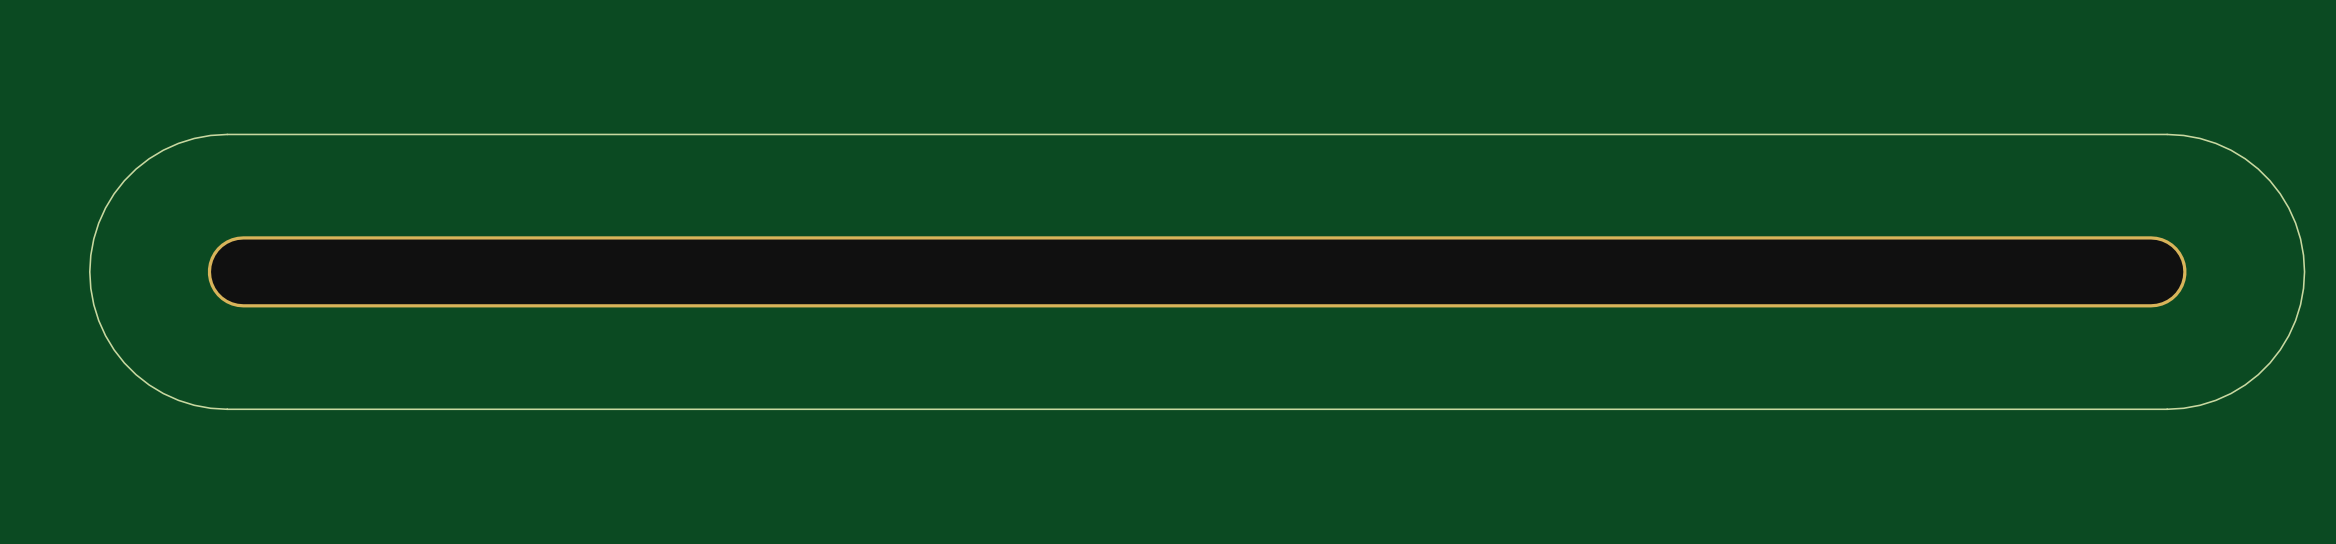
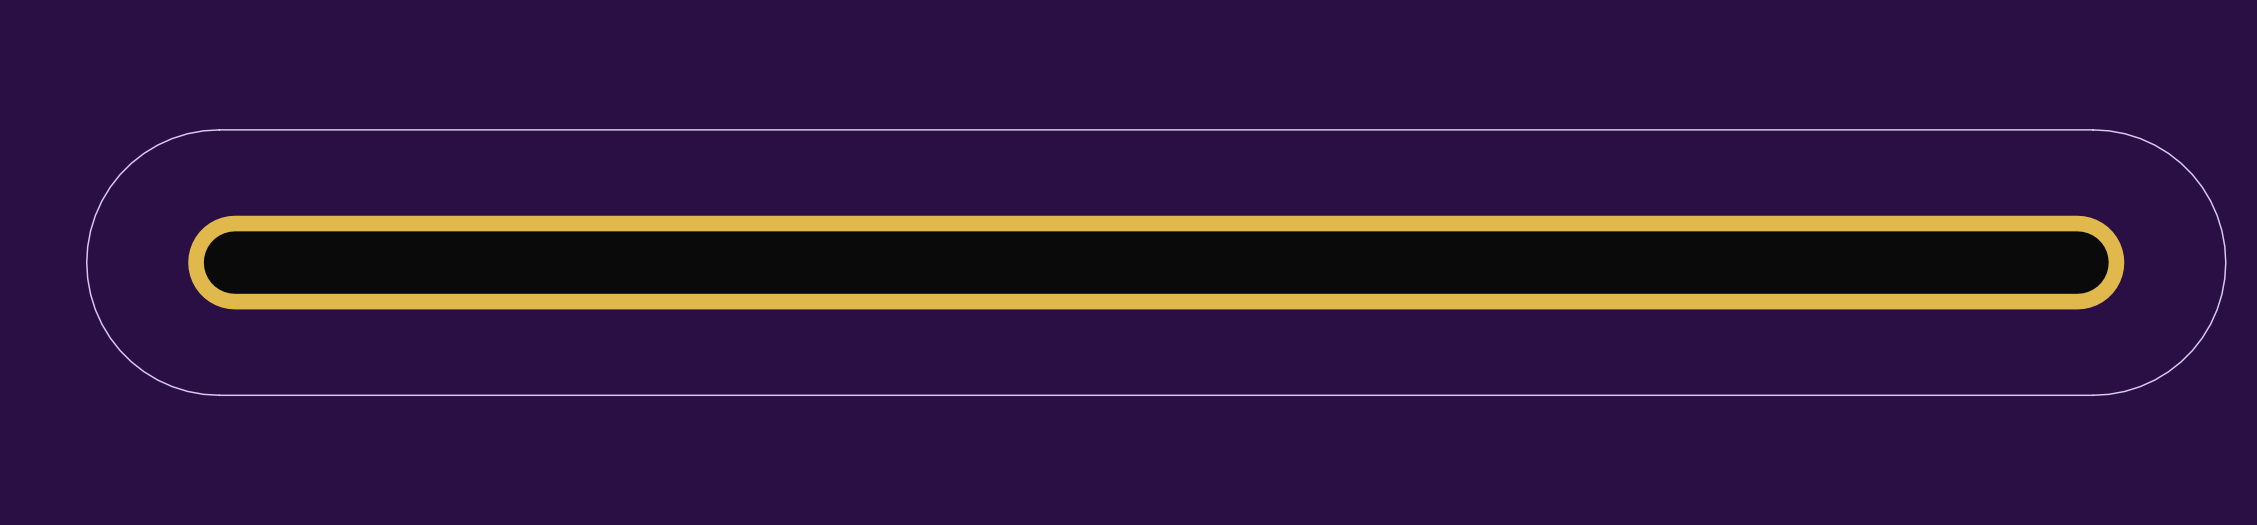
part footprint: [207, 236, 2187, 308] -> [188, 215, 2125, 310]

